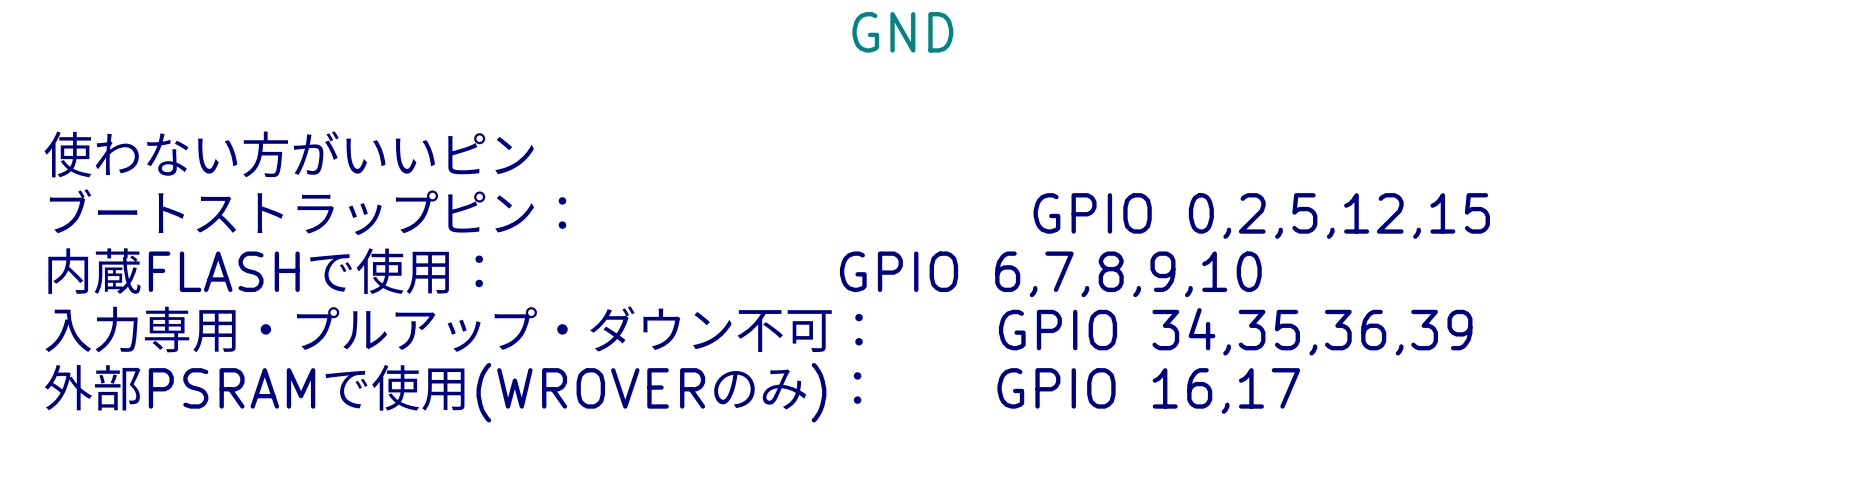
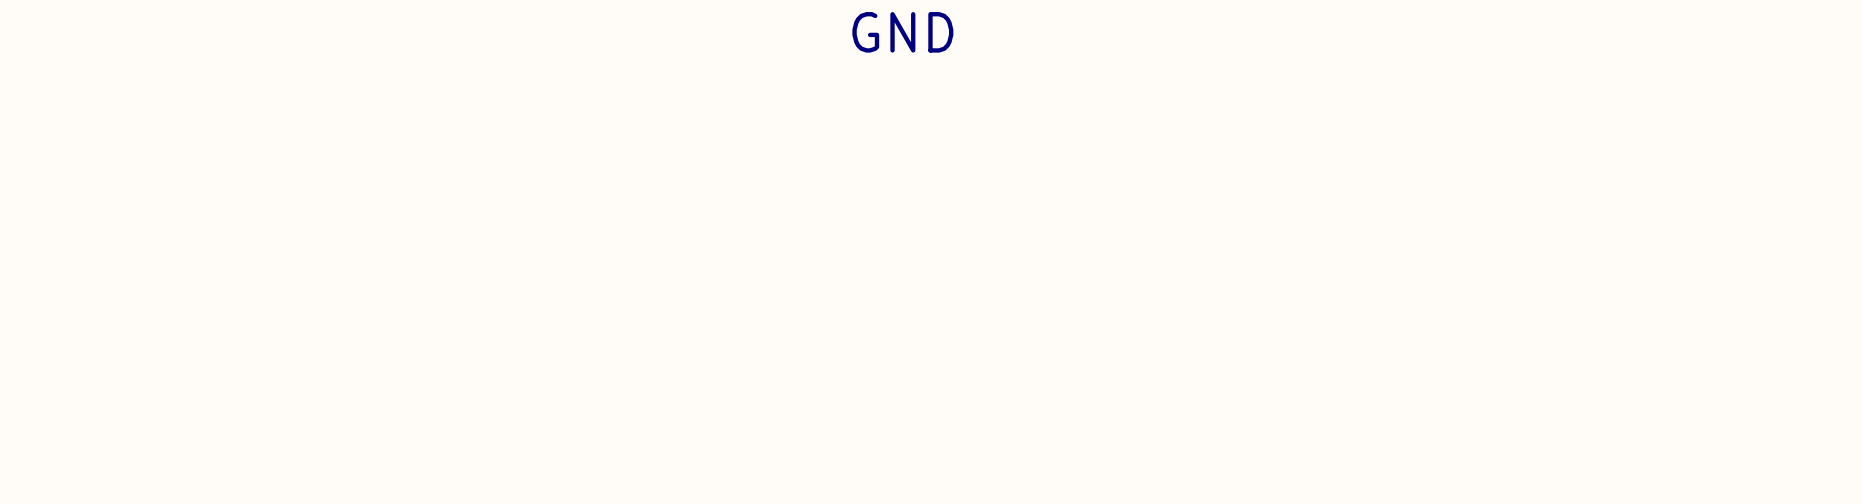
text: 使わない方がいいピン (289, 154) -> none
text: ブートストラップピン： GPIO 0,2,5,12,15 (768, 212) -> none
text: 内蔵FLASHで使用： GPIO 6,7,8,9,10 (653, 271) -> none
text: 入力専用・プルアップ・ダウン不可： GPIO 34,35,36,39 (757, 329) -> none
text: 外部PSRAMで使用(WROVERのみ)： GPIO 16,17 (671, 392) -> none

